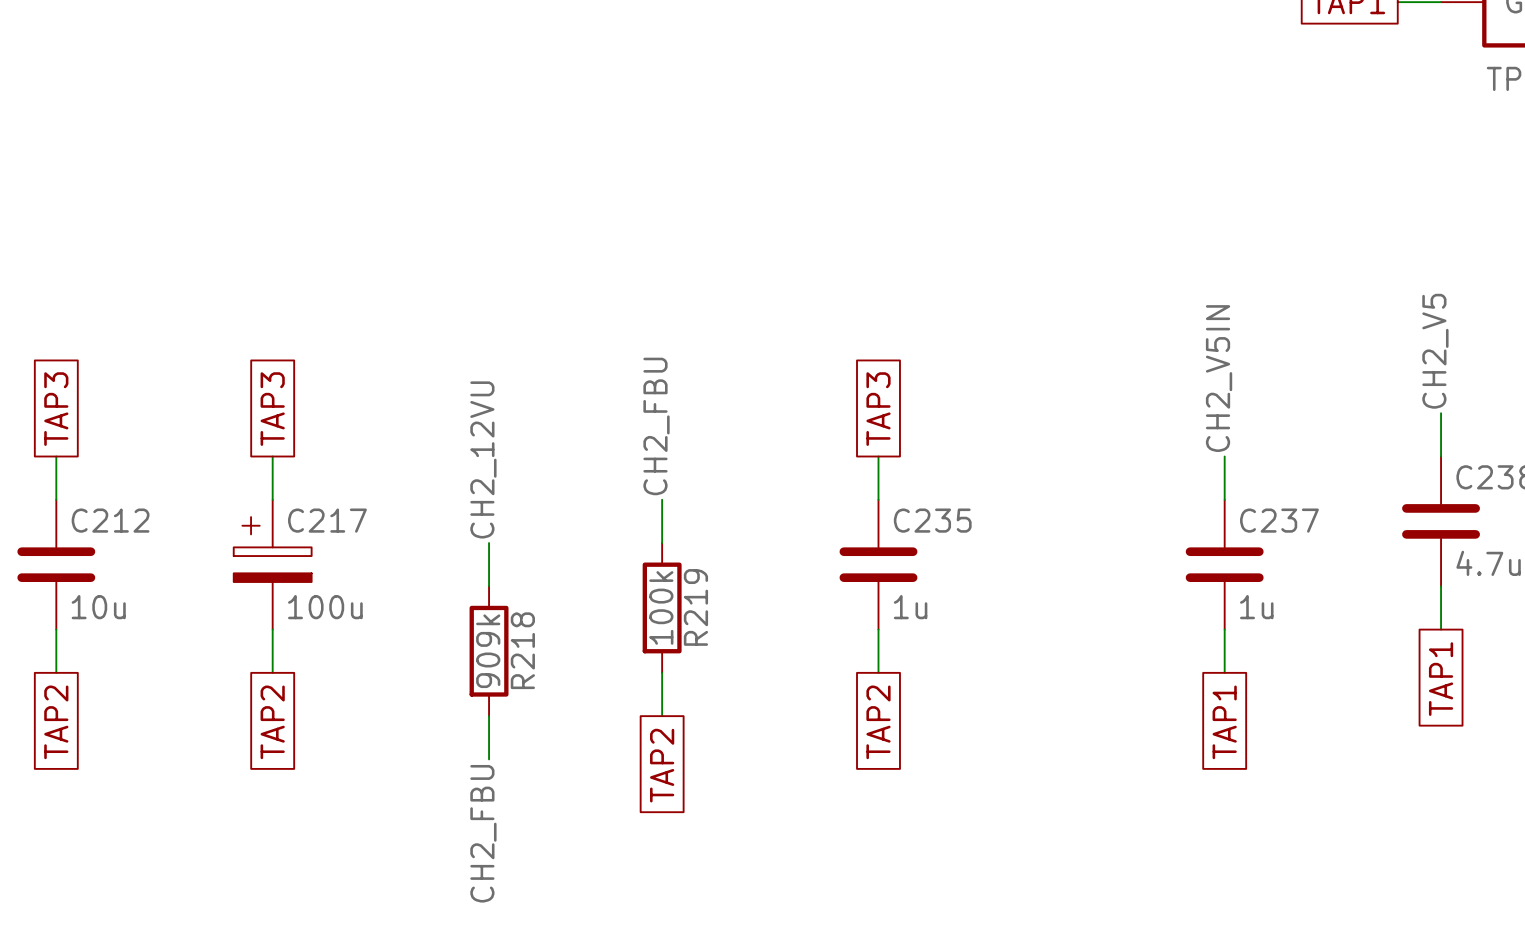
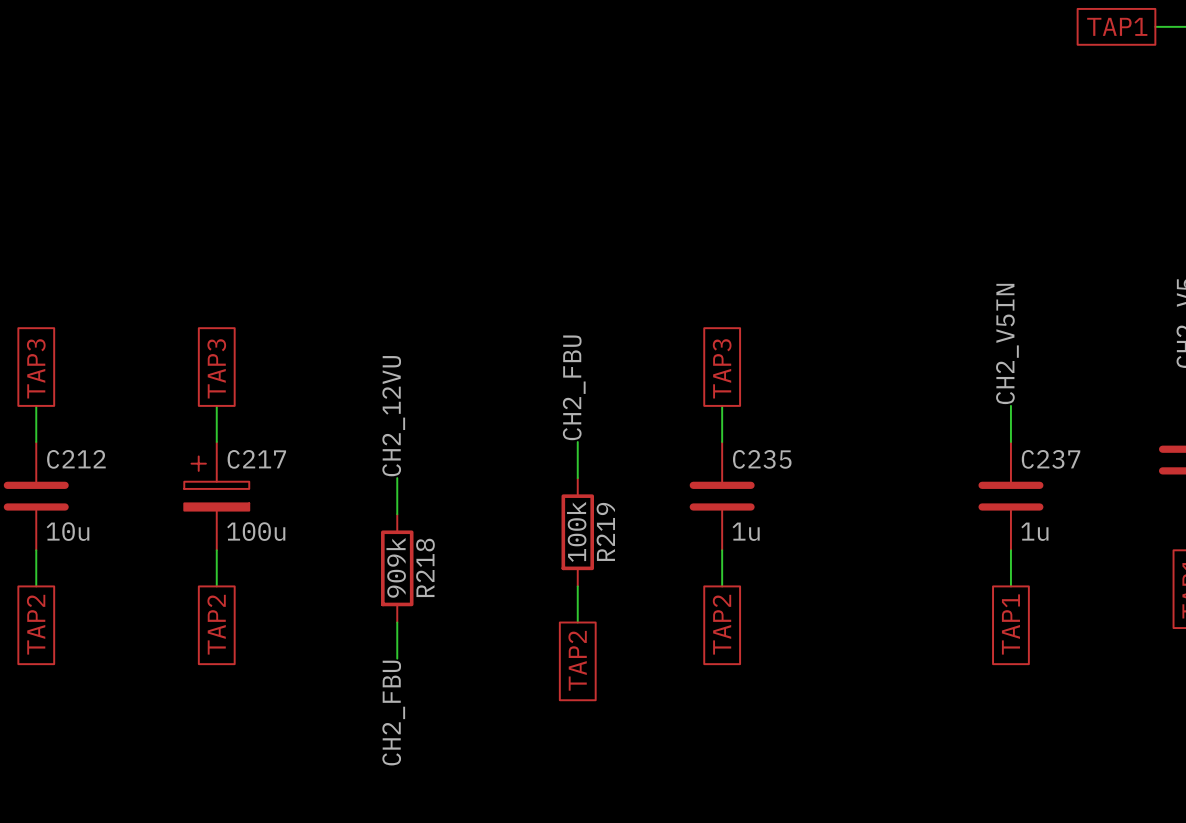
label position: CH2_FBU (656, 426) -> CH2_FBU (574, 387)
wire: (662, 499) (662, 543) -> (577, 442) (577, 478)
R219 position: (662, 607) -> (577, 532)
wire: (662, 672) (662, 716) -> (577, 586) (577, 622)
global label position: TAP2 (662, 765) -> TAP2 (577, 660)

